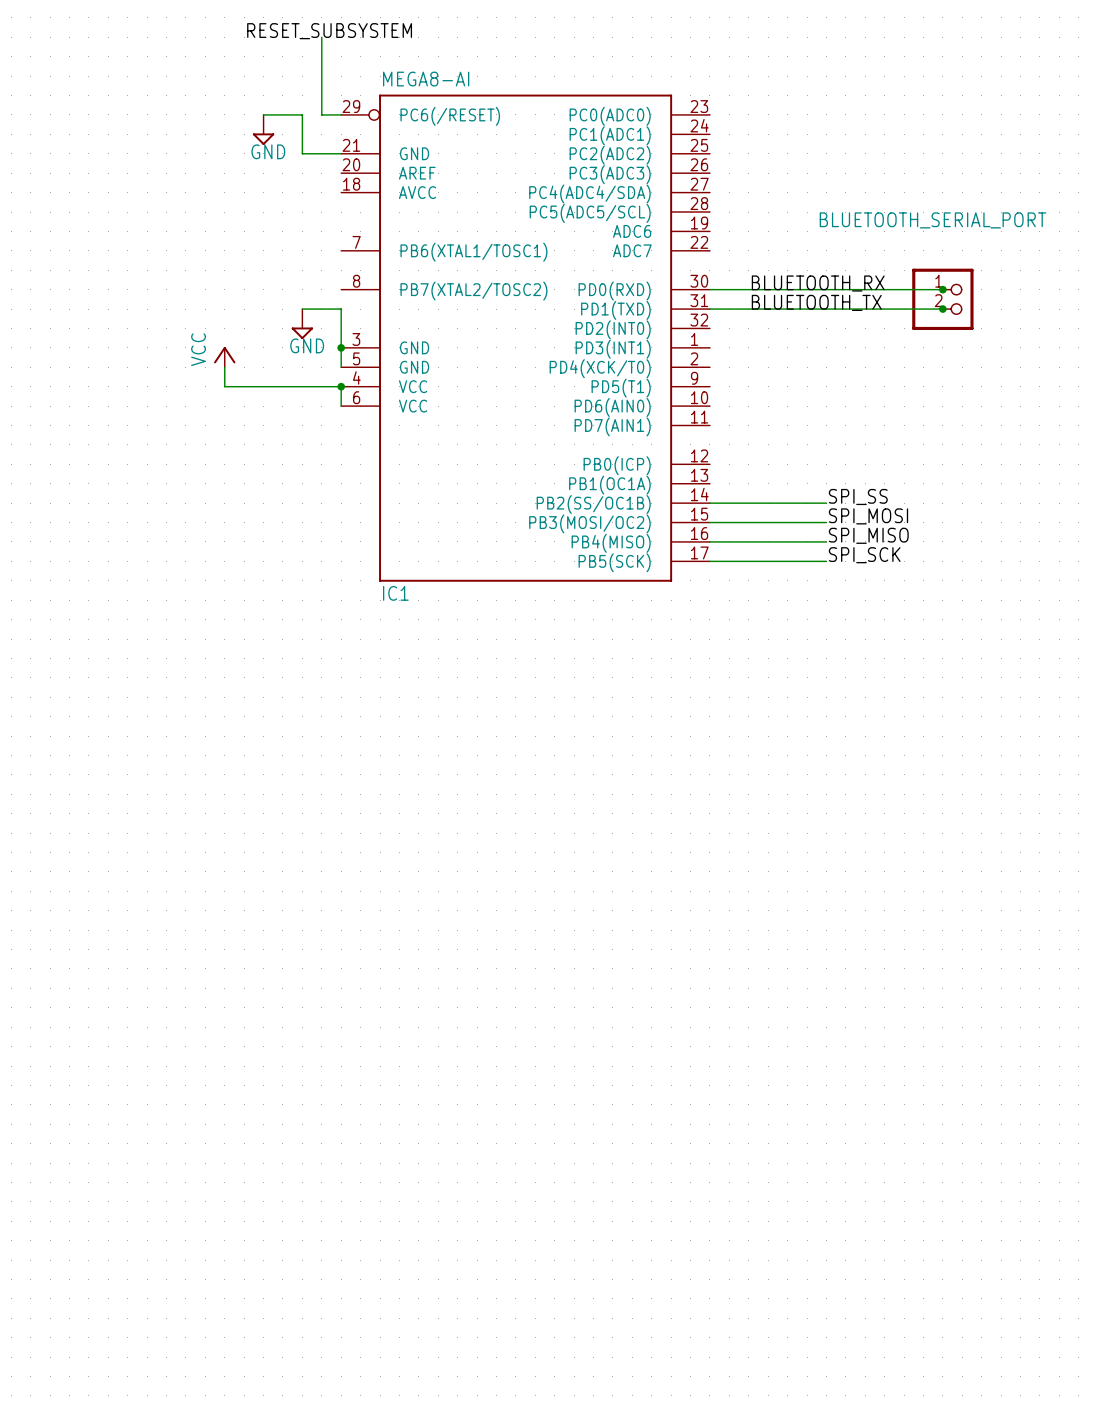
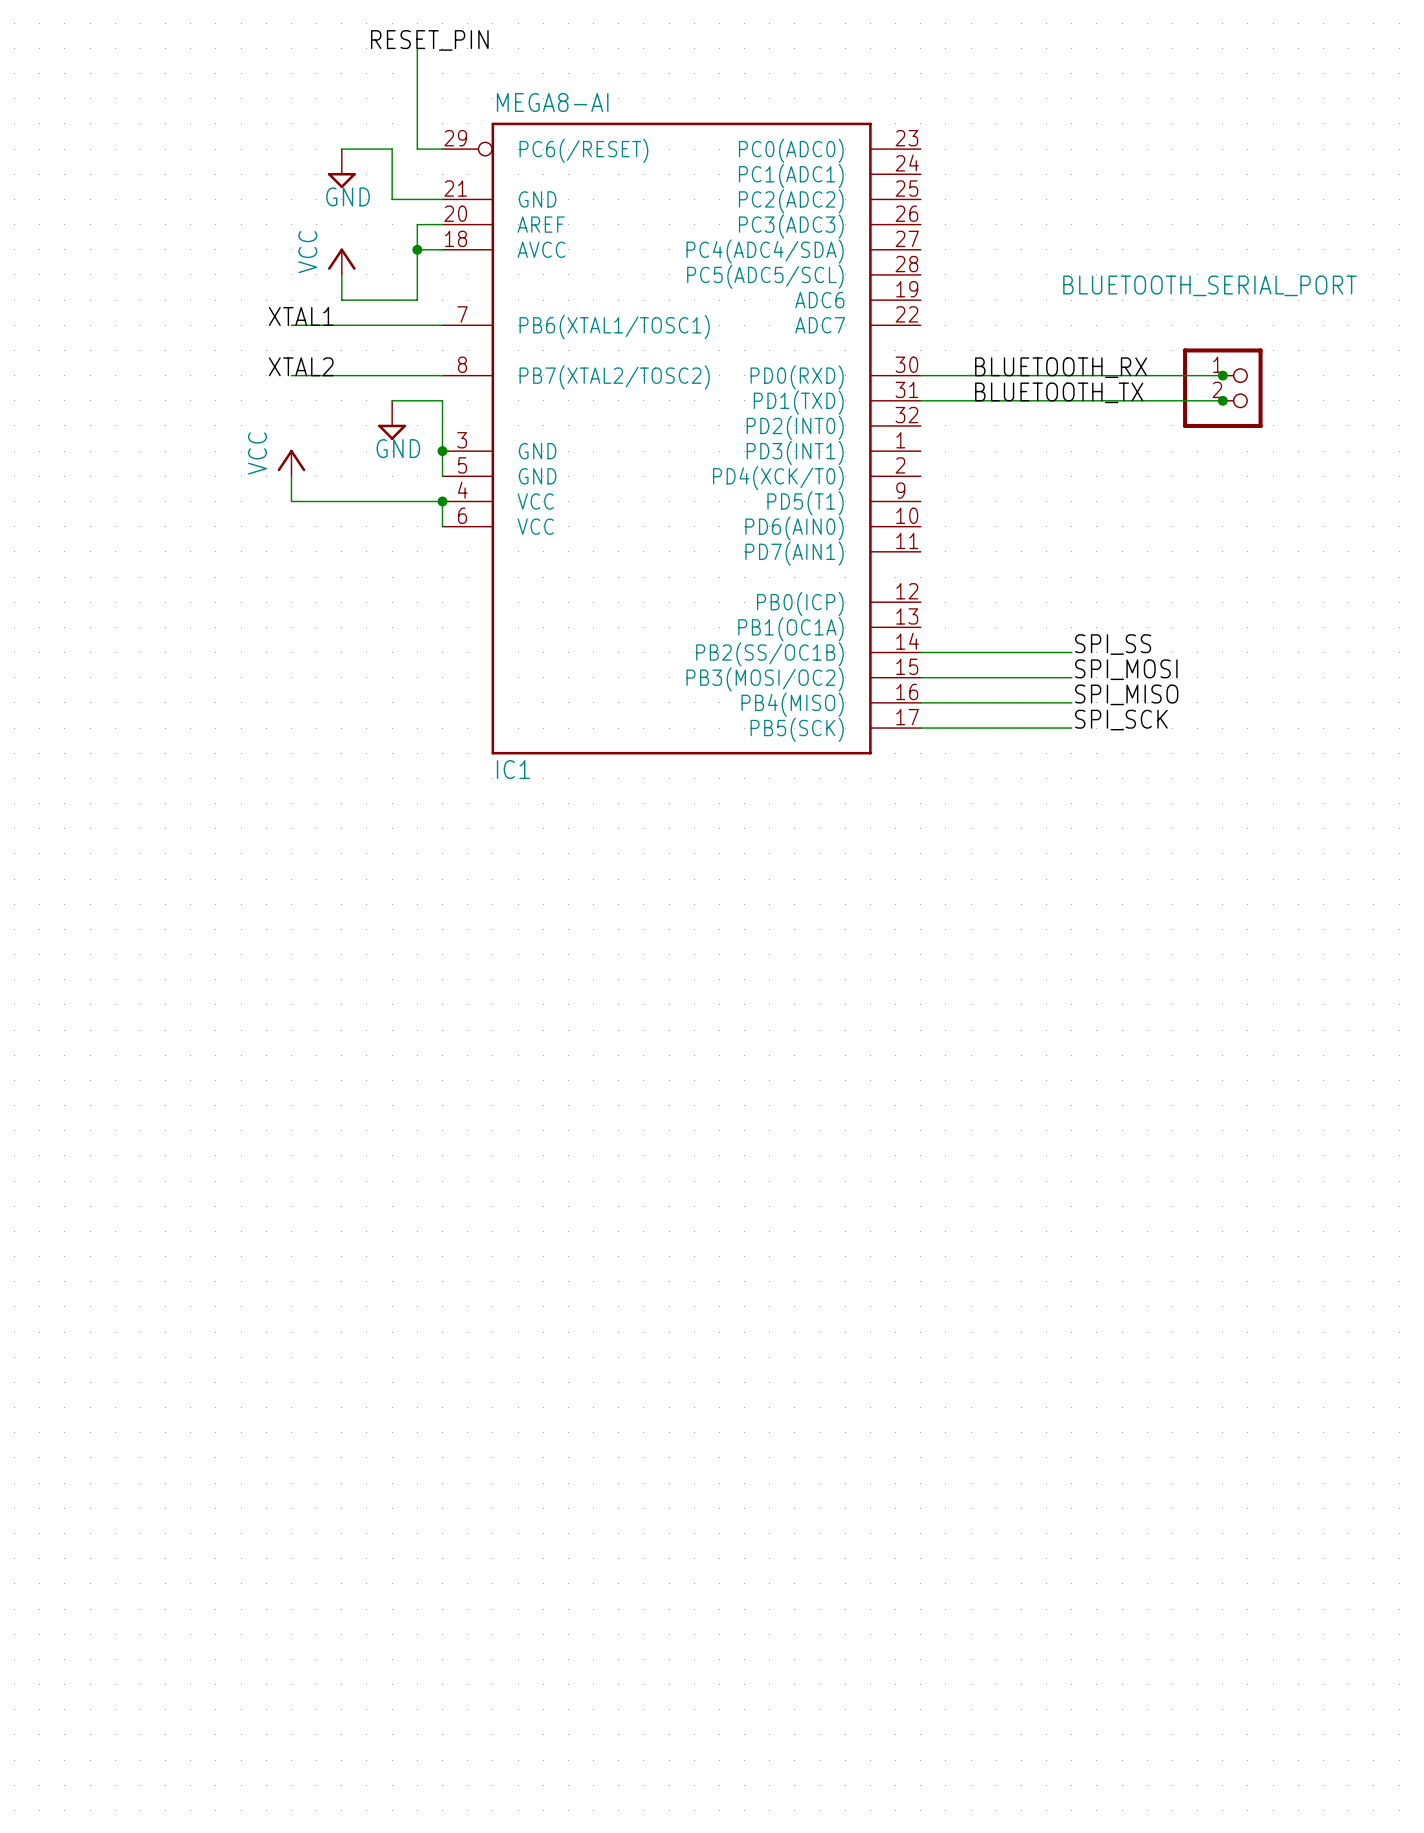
label: RESET_SUBSYSTEM (329, 31) -> none
label: none -> RESET_PIN (429, 40)
wire: none -> (442, 224) (417, 224) (417, 300) (341, 300) (341, 274)
wire: none -> (417, 249) (442, 249)
junction: none -> (417, 249)
power symbol: none -> VCC (341, 261)
label: none -> XTAL1 (301, 316)
wire: none -> (291, 325) (442, 325)
label: none -> XTAL2 (301, 366)
wire: none -> (291, 375) (442, 375)

